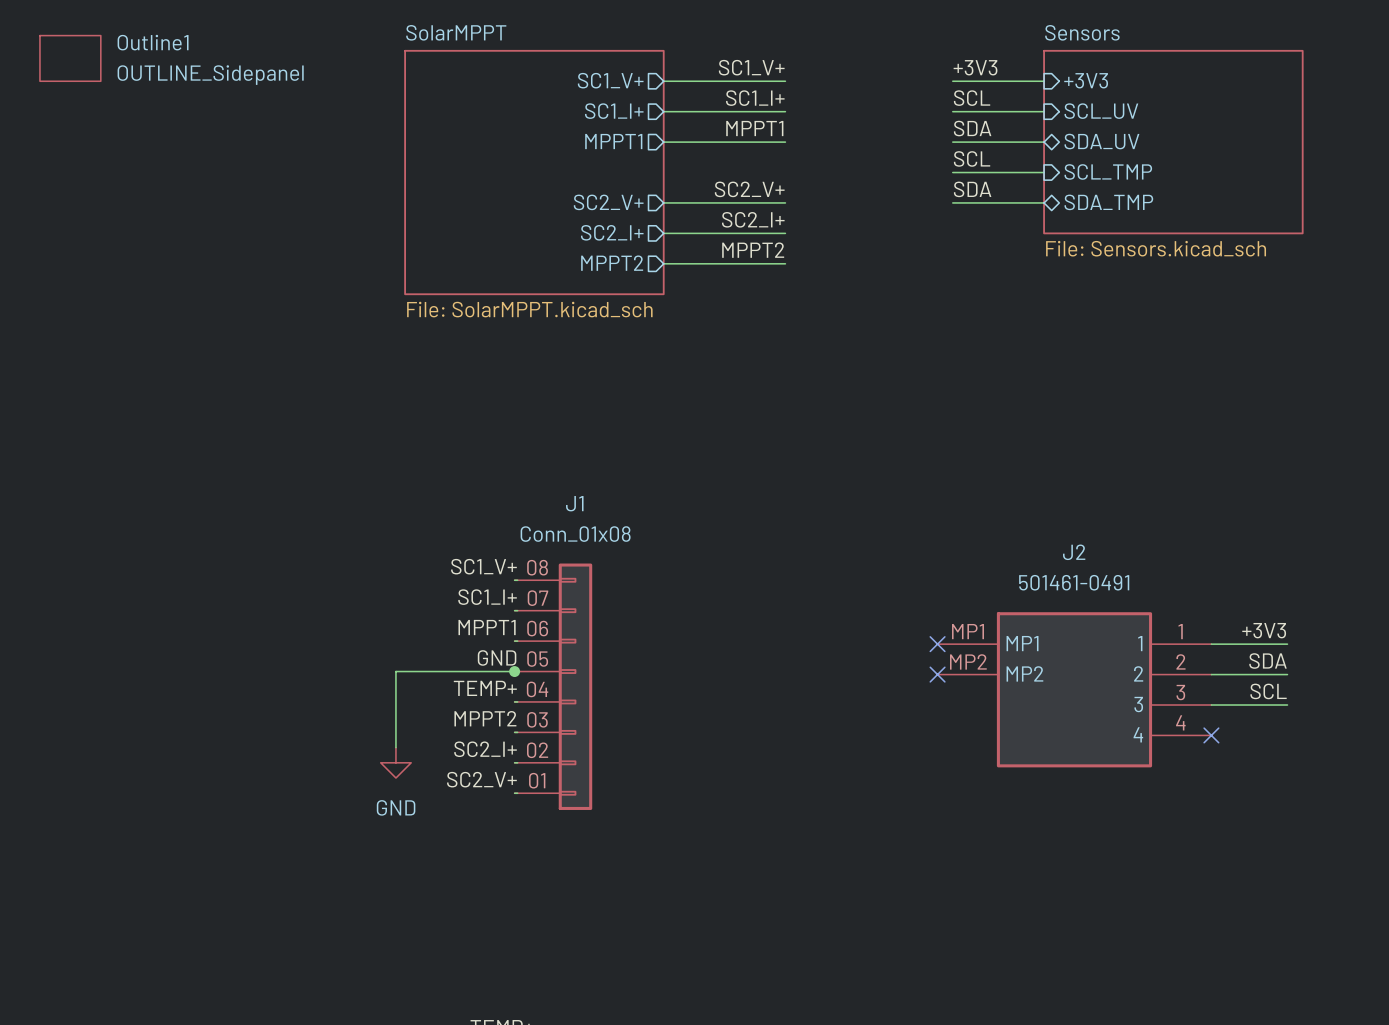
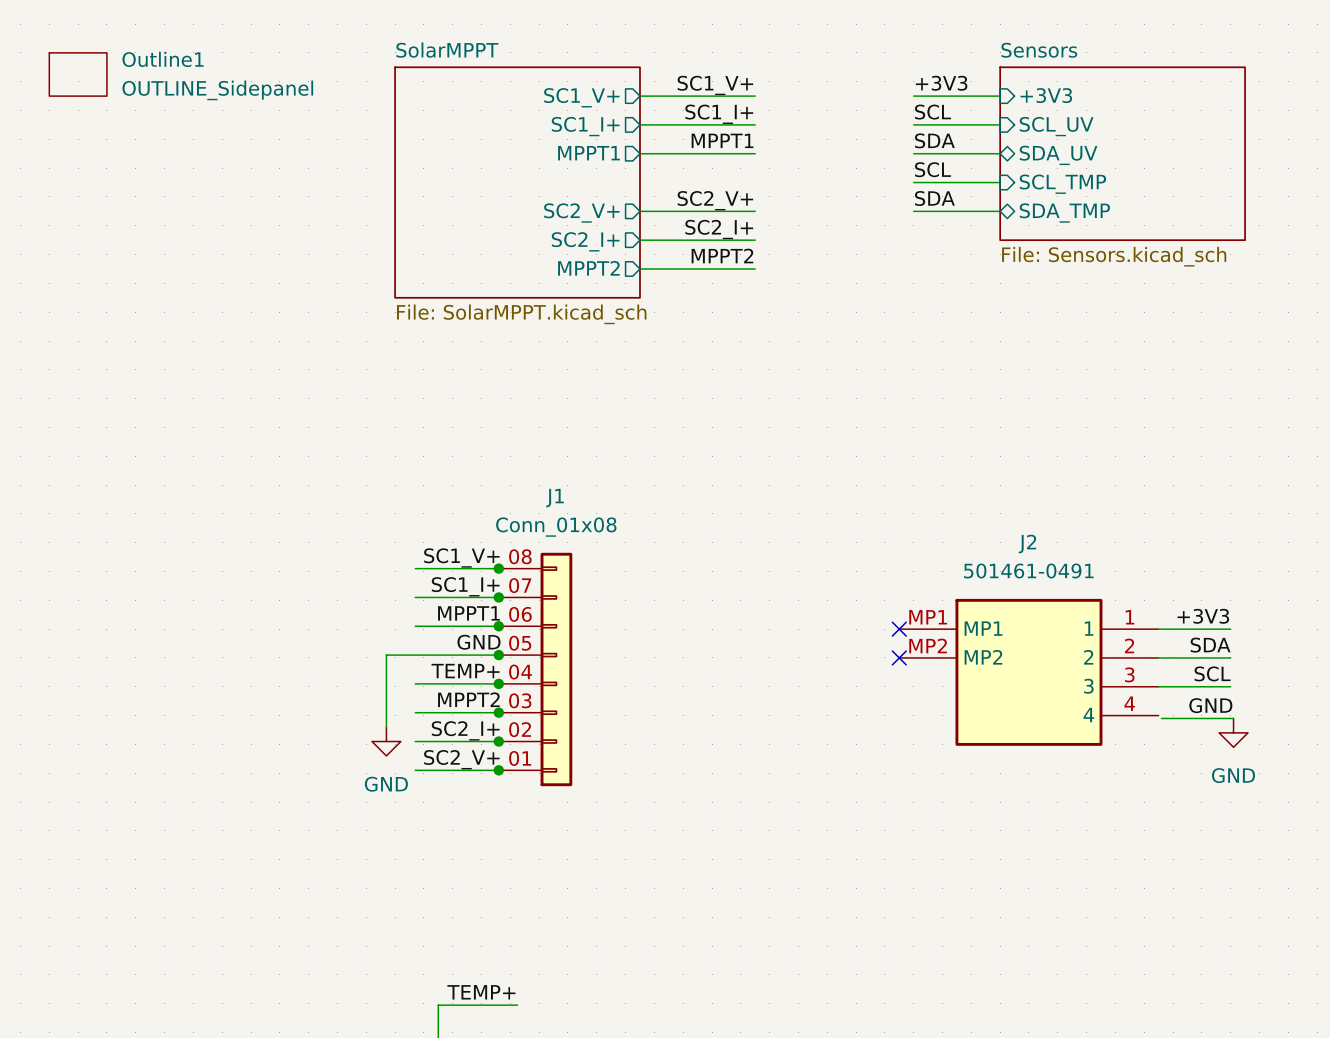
wire: none -> (415, 568) (498, 568)
junction: none -> (498, 568)
wire: none -> (415, 597) (498, 597)
junction: none -> (498, 597)
wire: none -> (415, 626) (498, 626)
junction: none -> (498, 626)
wire: none -> (415, 683) (498, 683)
junction: none -> (498, 683)
label: none -> GND (1210, 705)
wire: none -> (415, 712) (498, 712)
junction: none -> (498, 712)
no-connect mark: (1211, 735) -> none
wire: none -> (1161, 718) (1233, 718)
power symbol: none -> GND (1233, 732)
wire: none -> (415, 741) (498, 741)
junction: none -> (498, 741)
wire: none -> (415, 770) (498, 770)
junction: none -> (498, 770)

